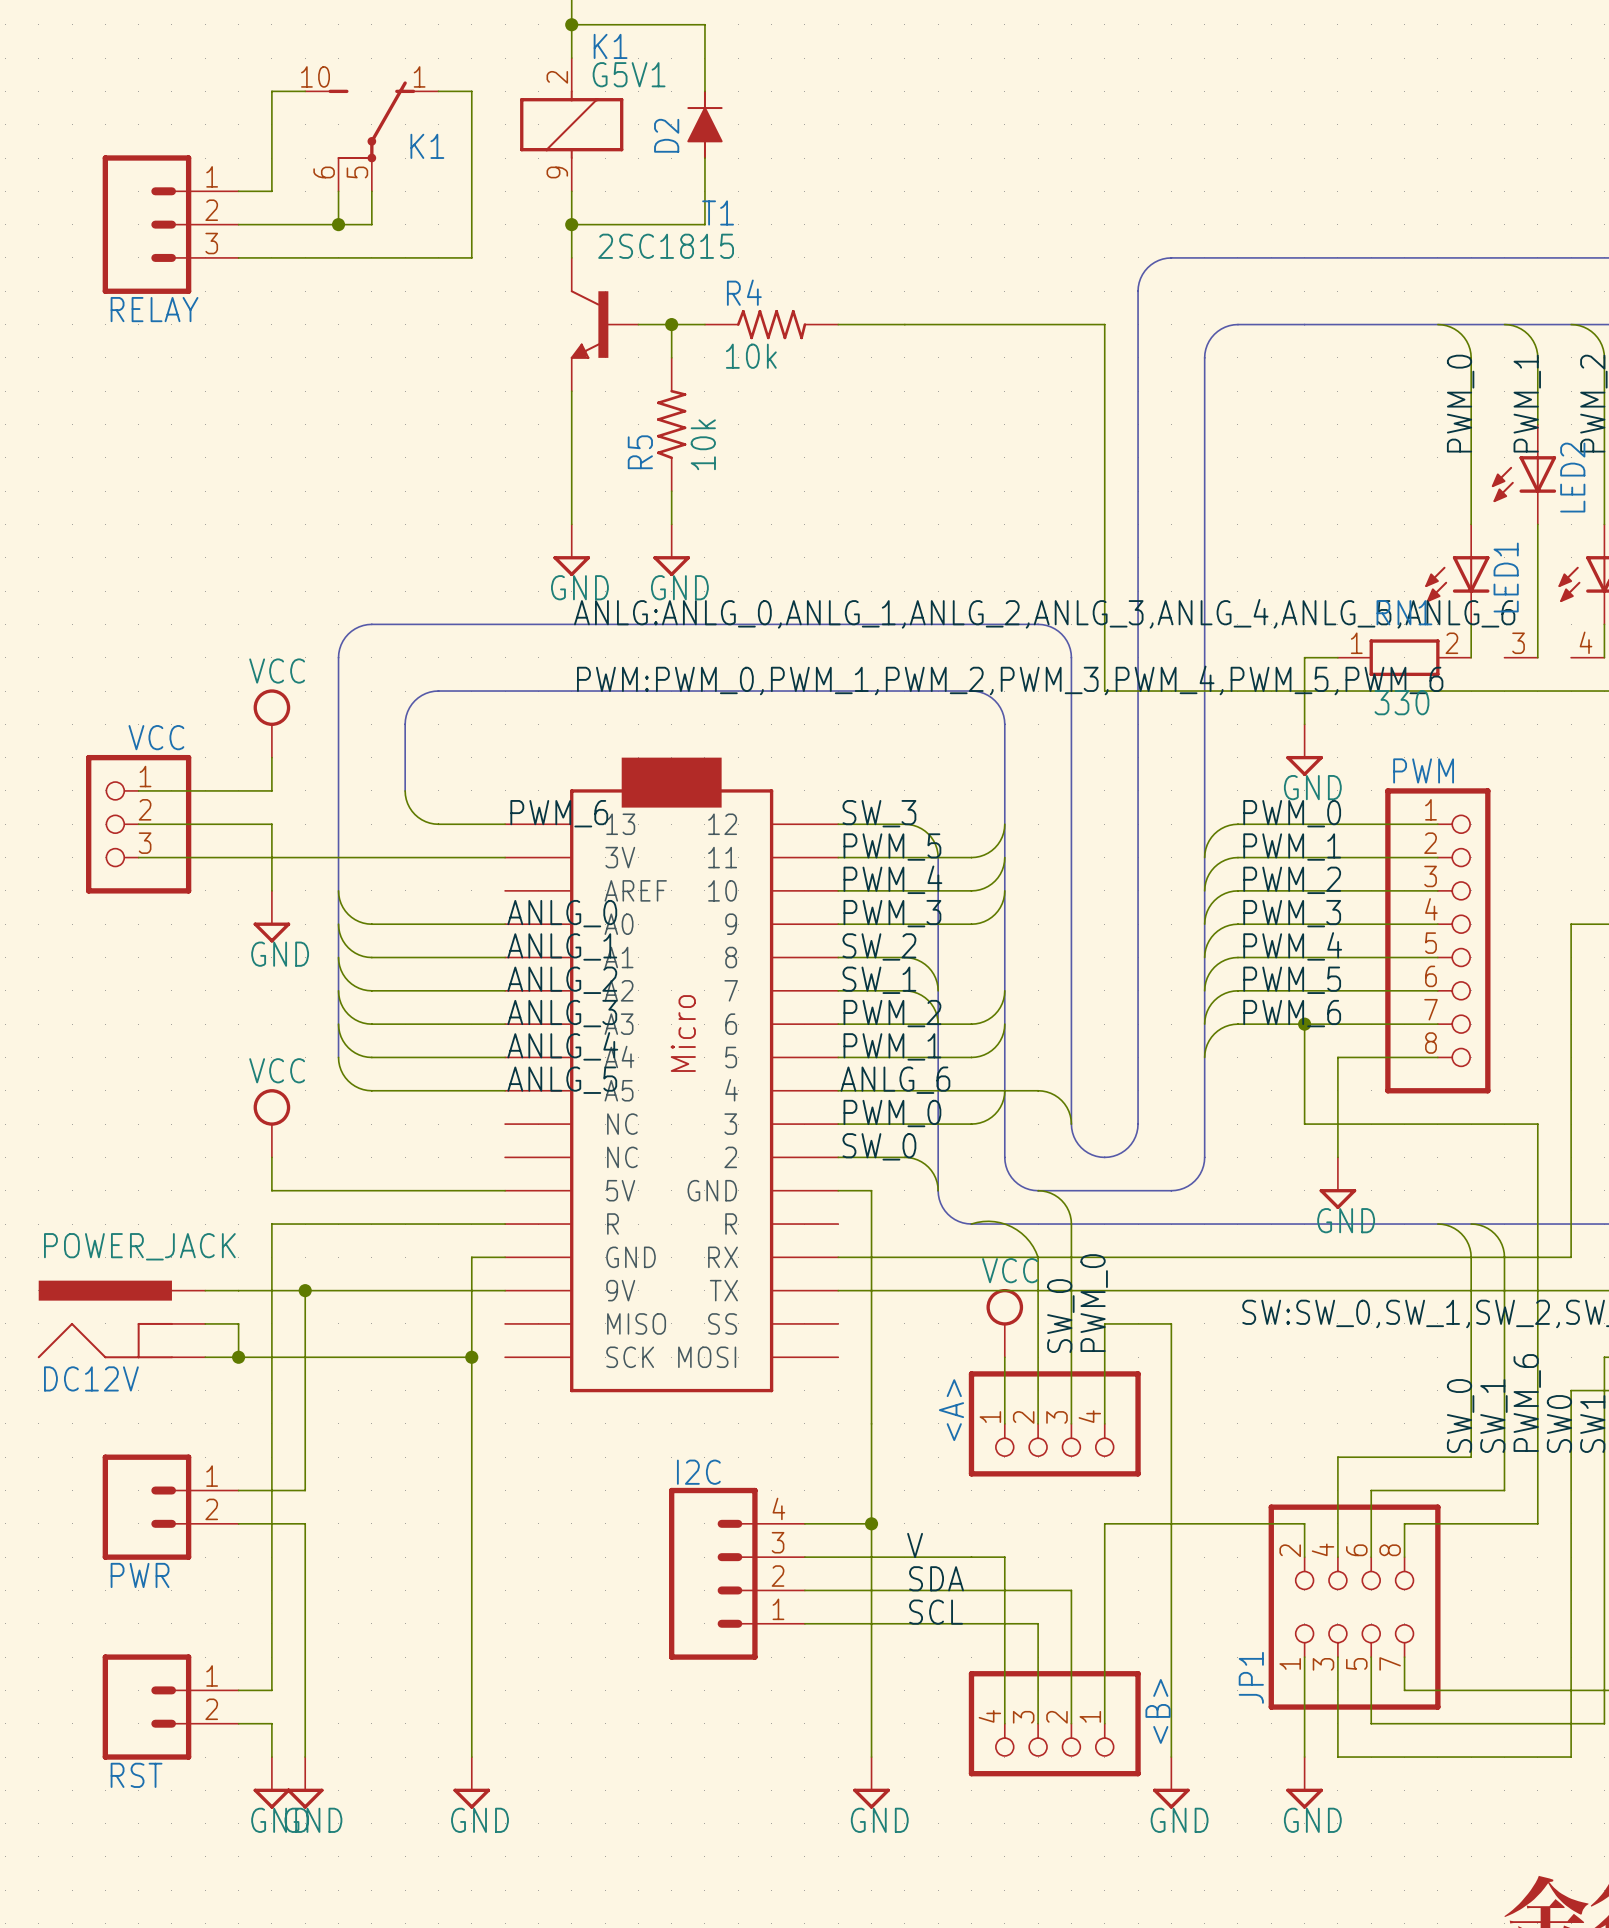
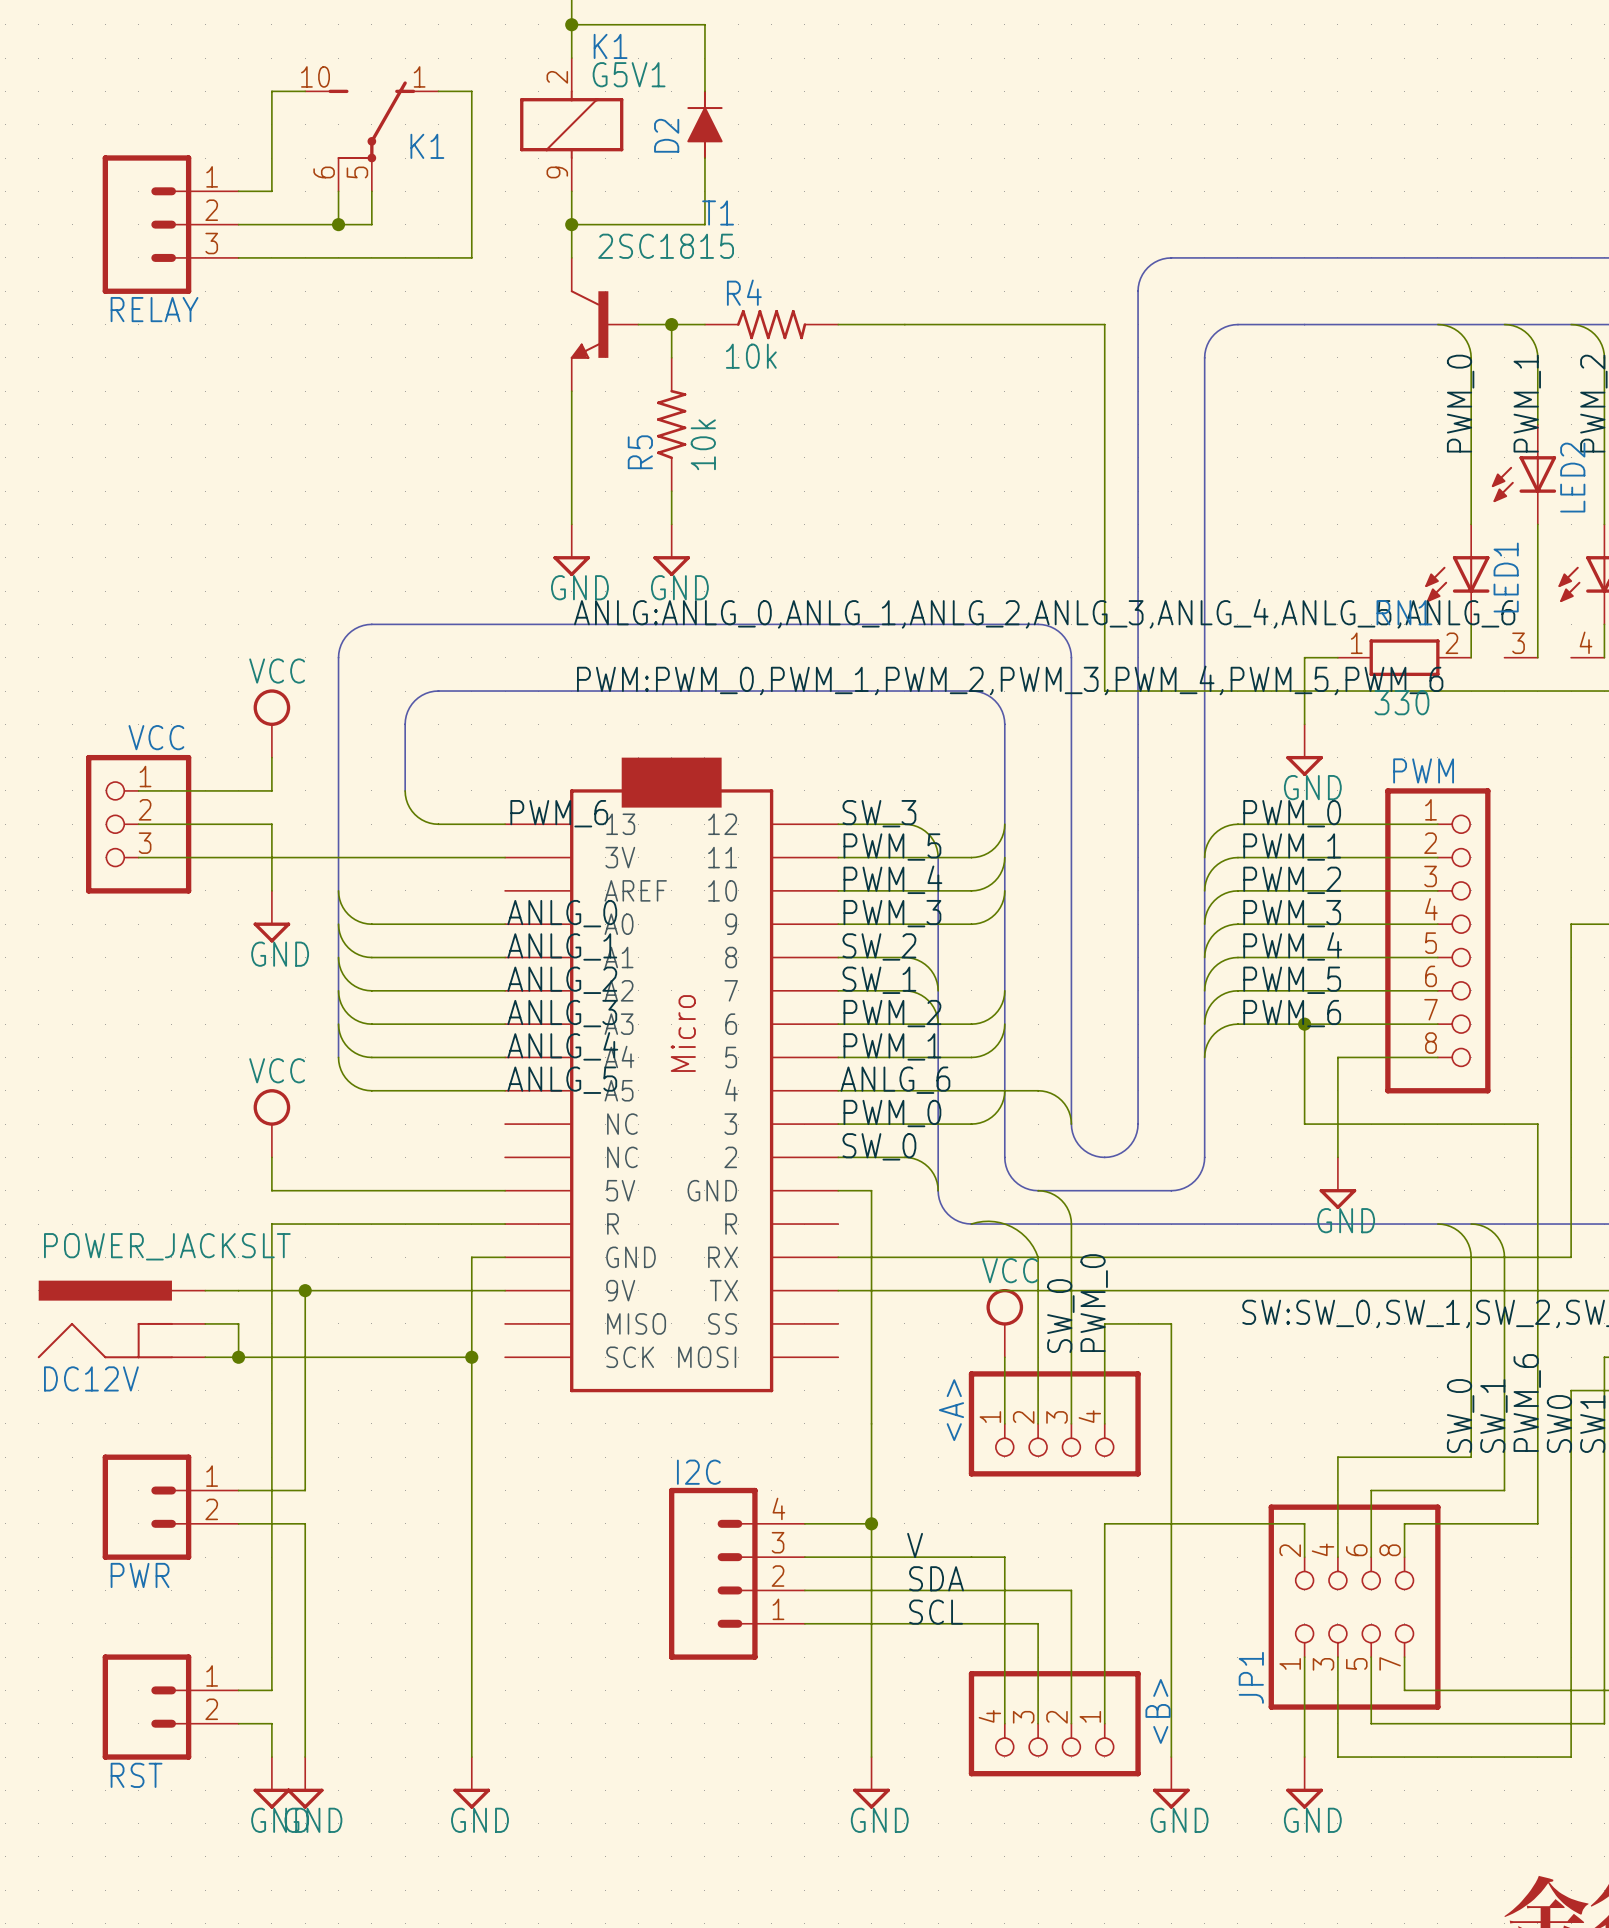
DC12V value: POWER_JACK (139, 1246) -> POWER_JACKSLT (167, 1246)

